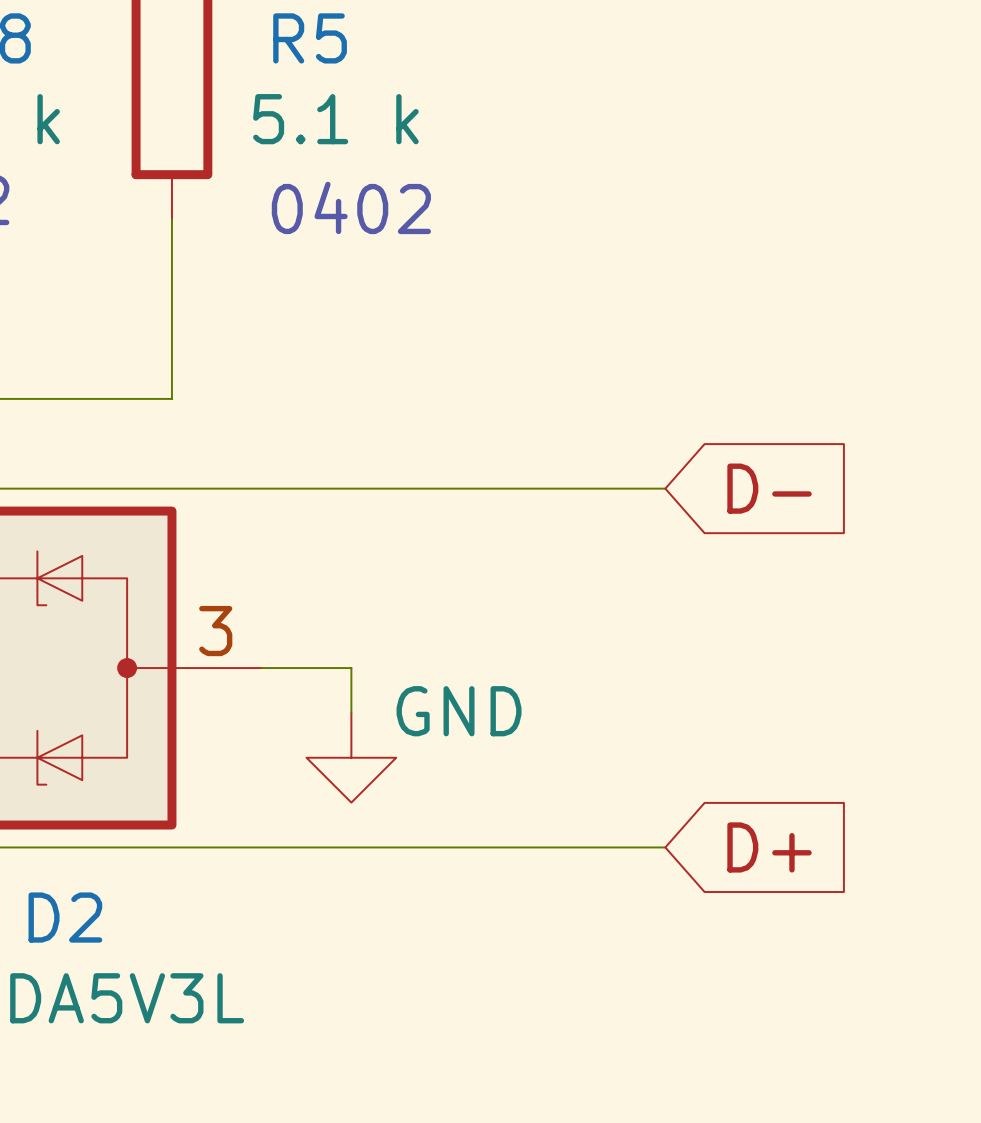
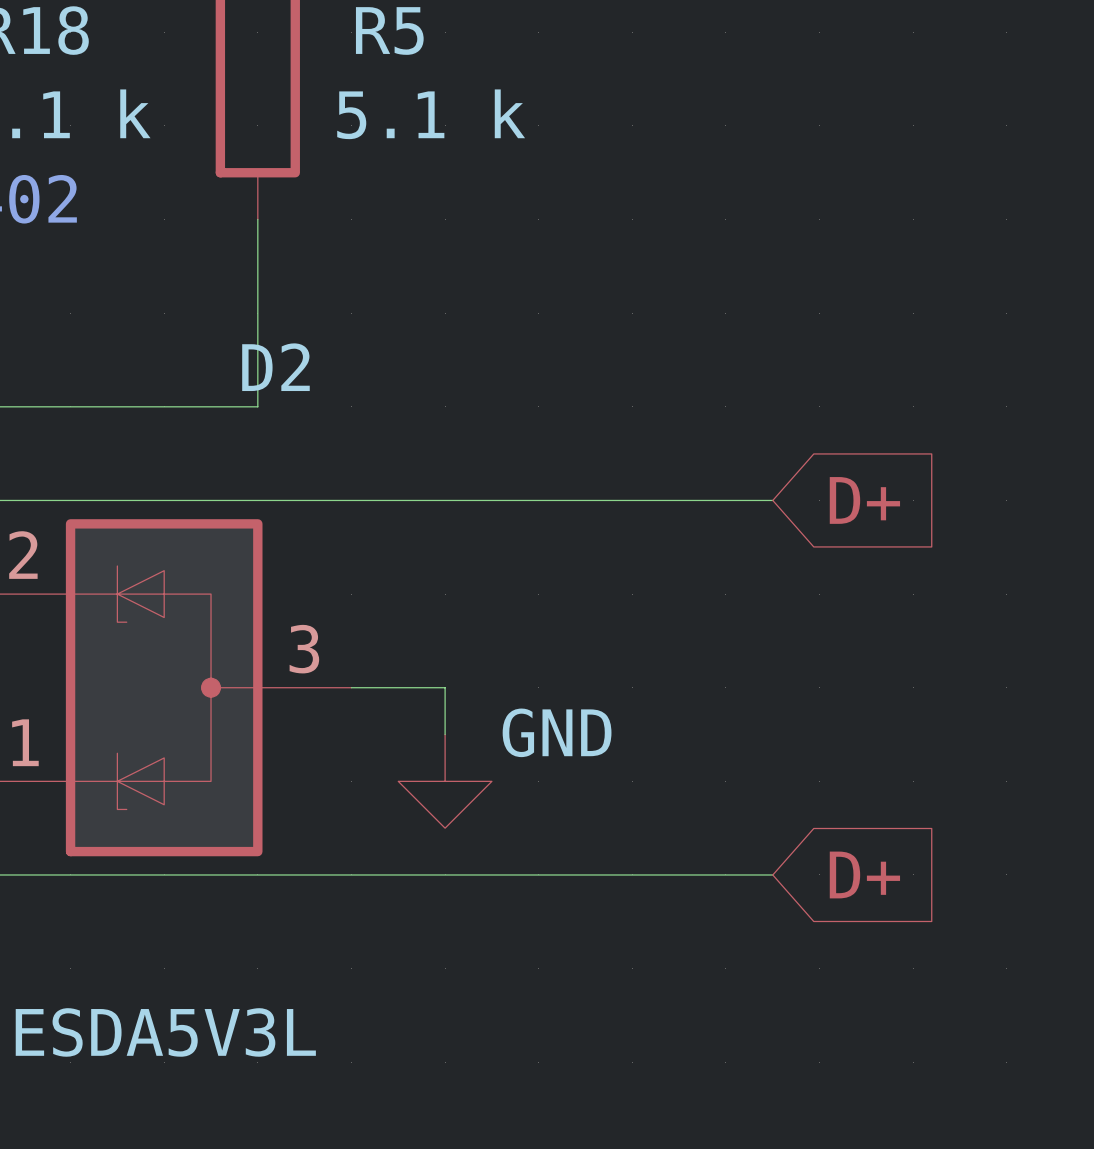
text: 0402 (351, 207) -> none
global label: D- (769, 488) -> D+ (864, 500)
D2 name position: D2 (65, 917) -> D2 (275, 367)

